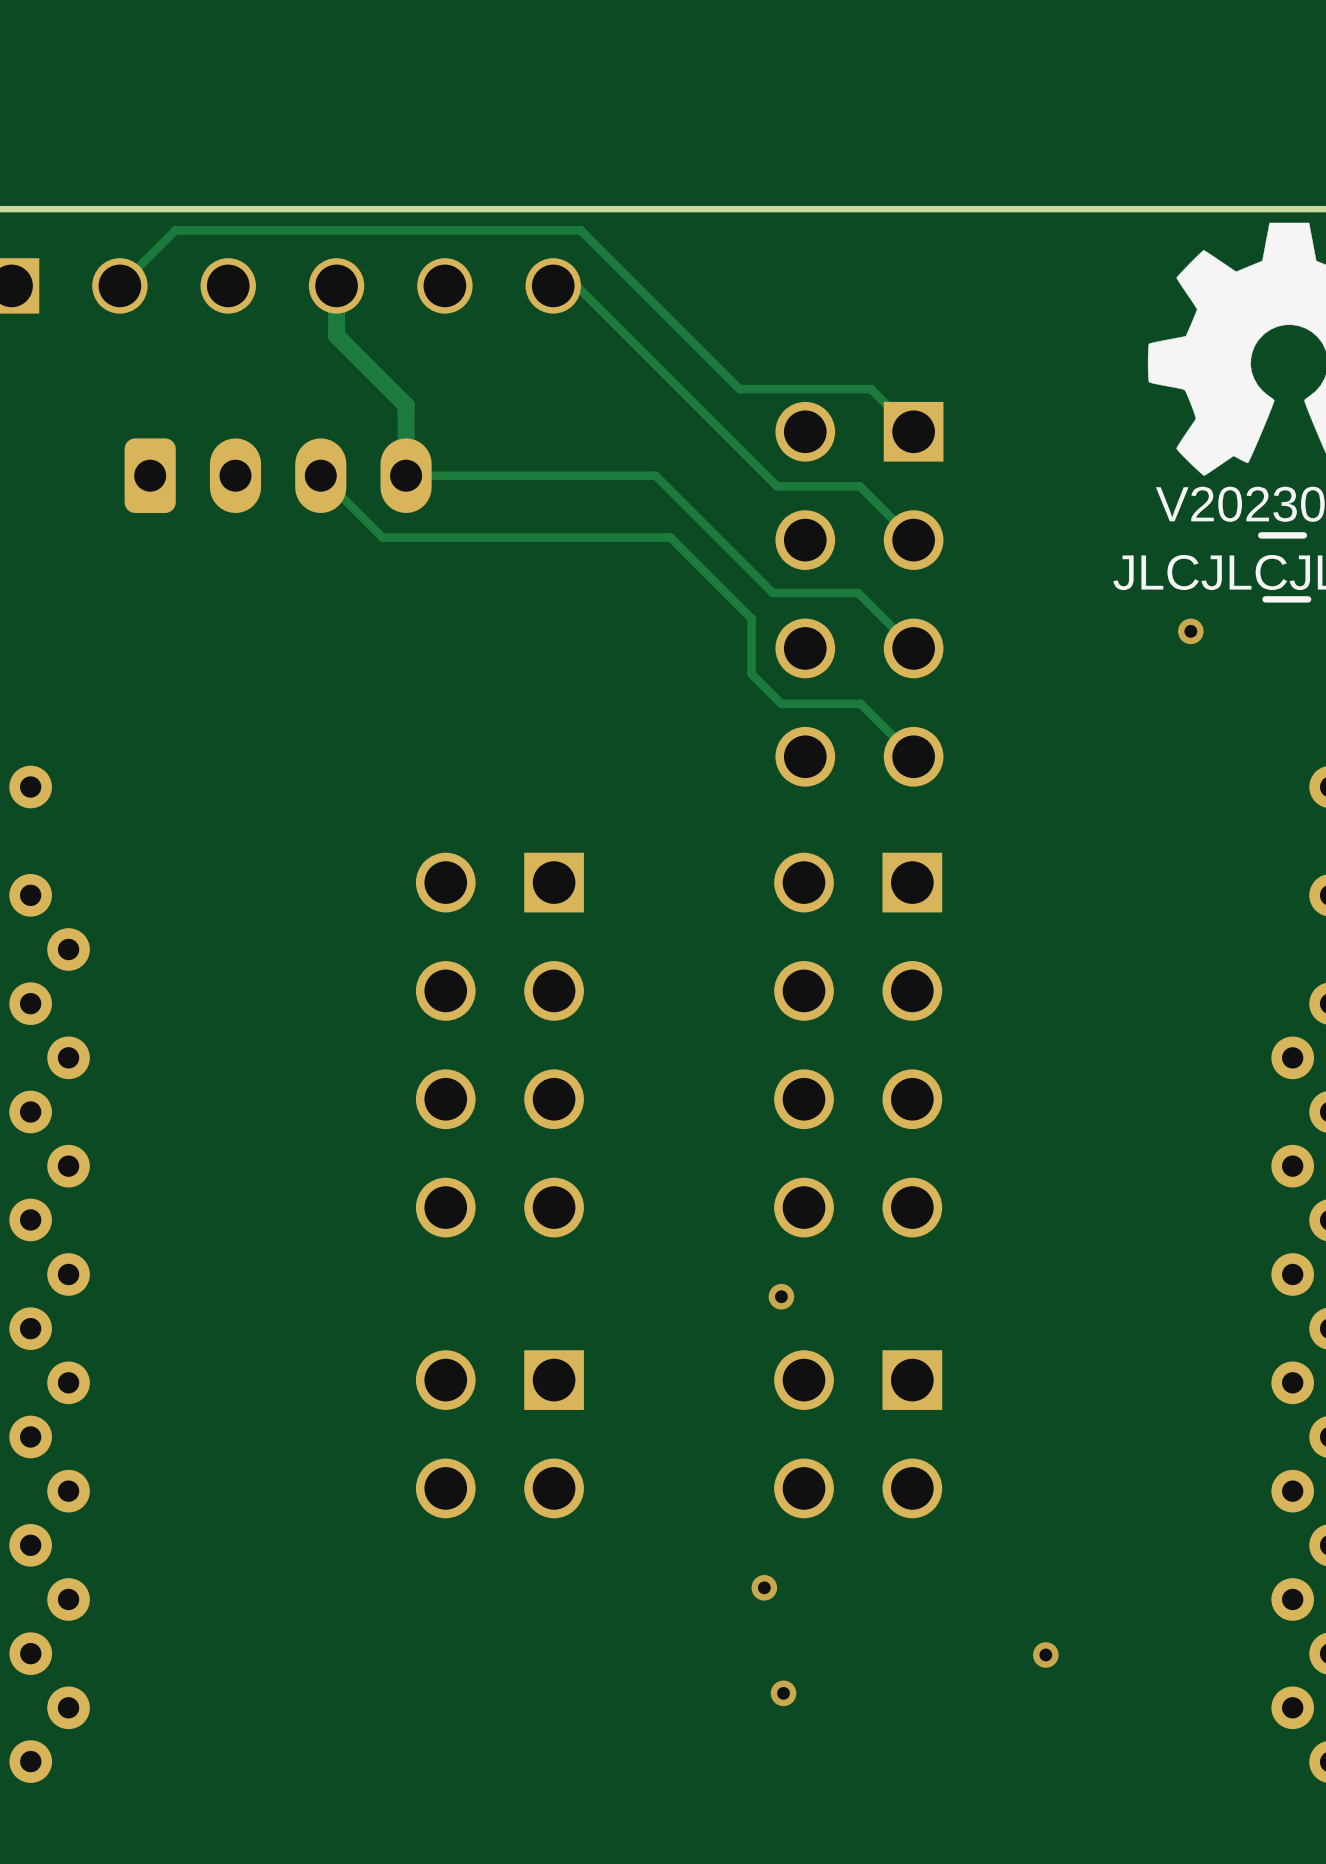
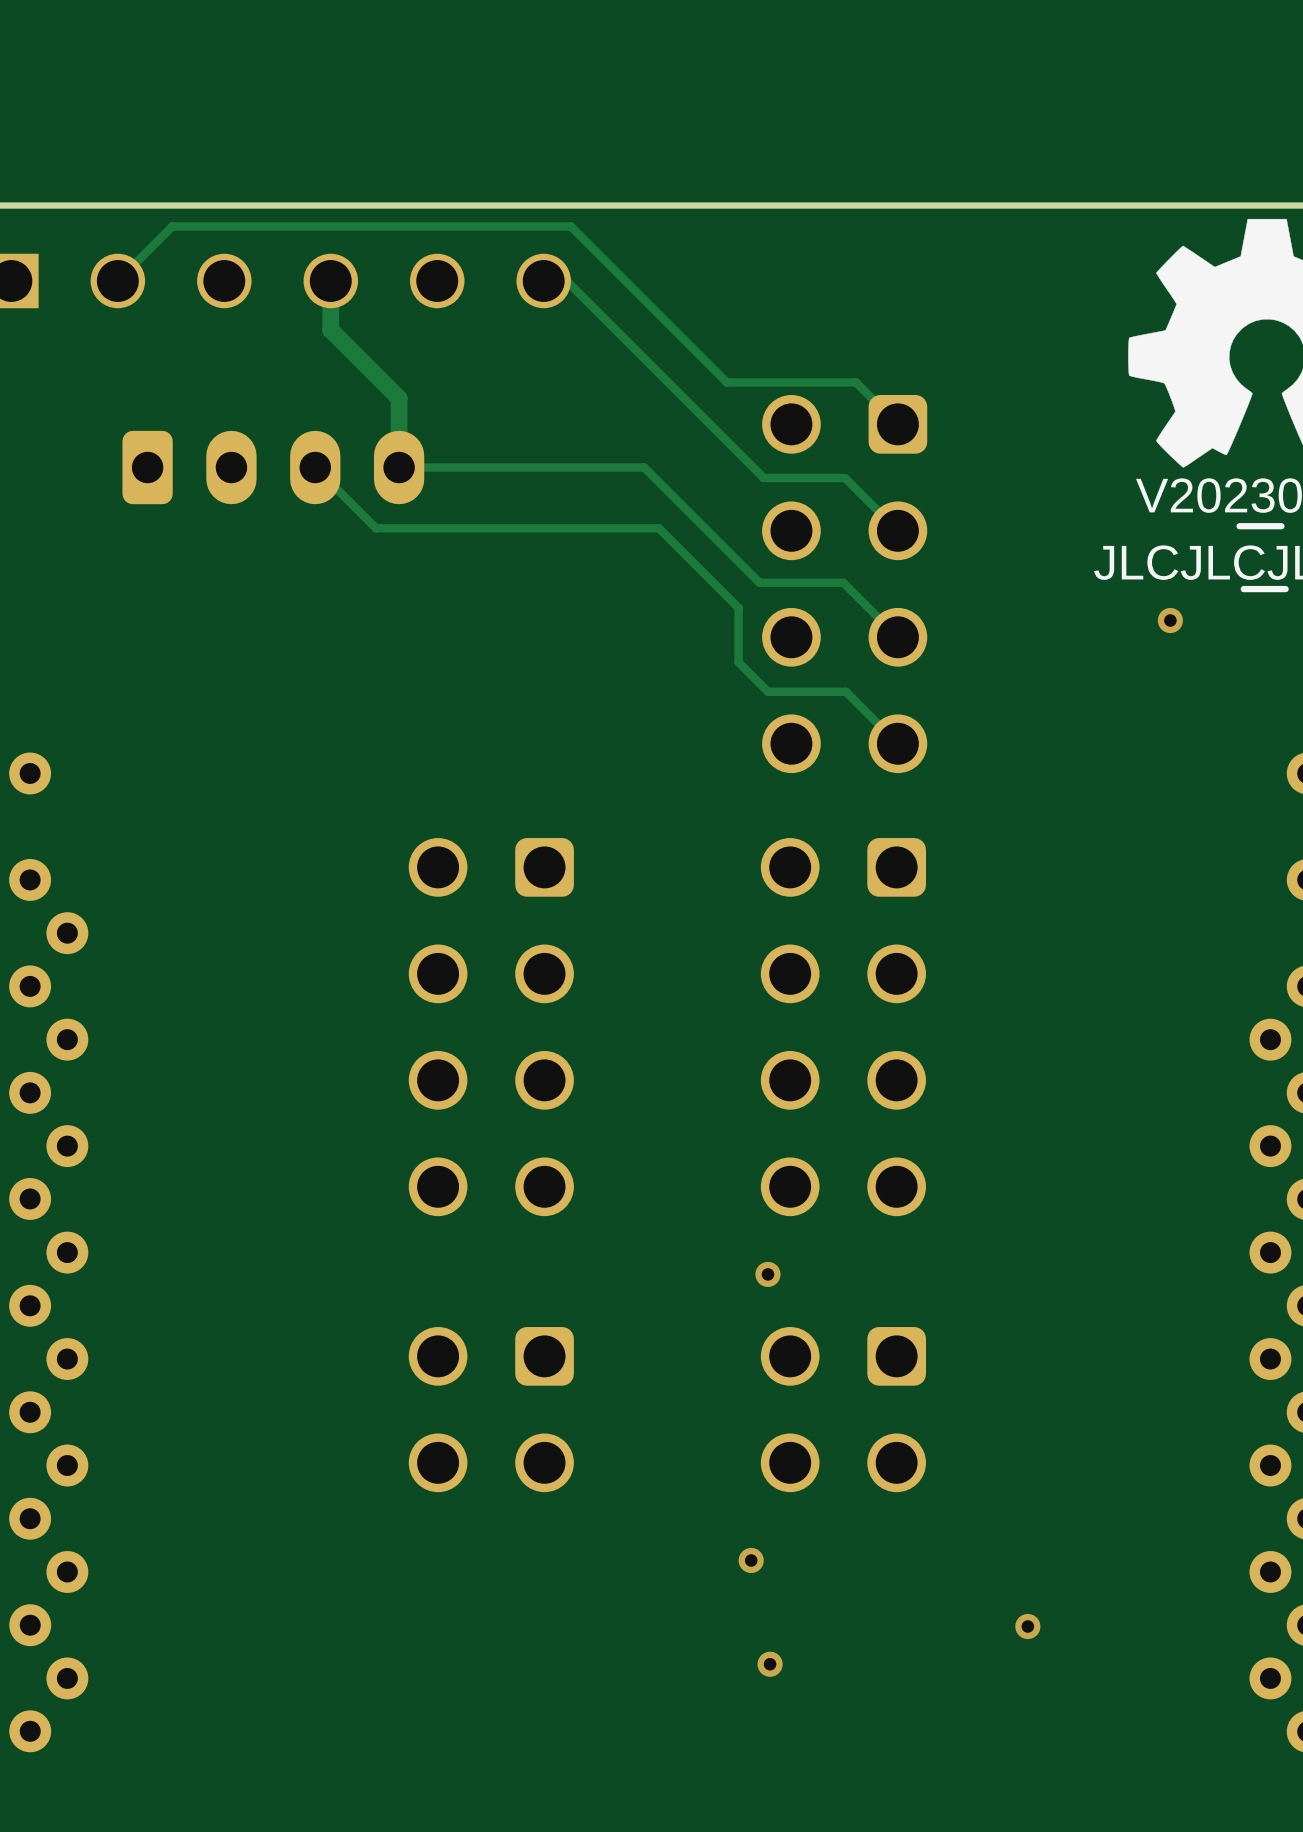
part footprint: [775, 401, 944, 787] -> [762, 395, 928, 774]
part footprint: [415, 852, 584, 1238] -> [408, 838, 574, 1217]
part footprint: [774, 852, 943, 1238] -> [760, 838, 926, 1217]
part footprint: [415, 1350, 584, 1519] -> [408, 1327, 574, 1493]
part footprint: [774, 1350, 943, 1519] -> [760, 1327, 926, 1493]

